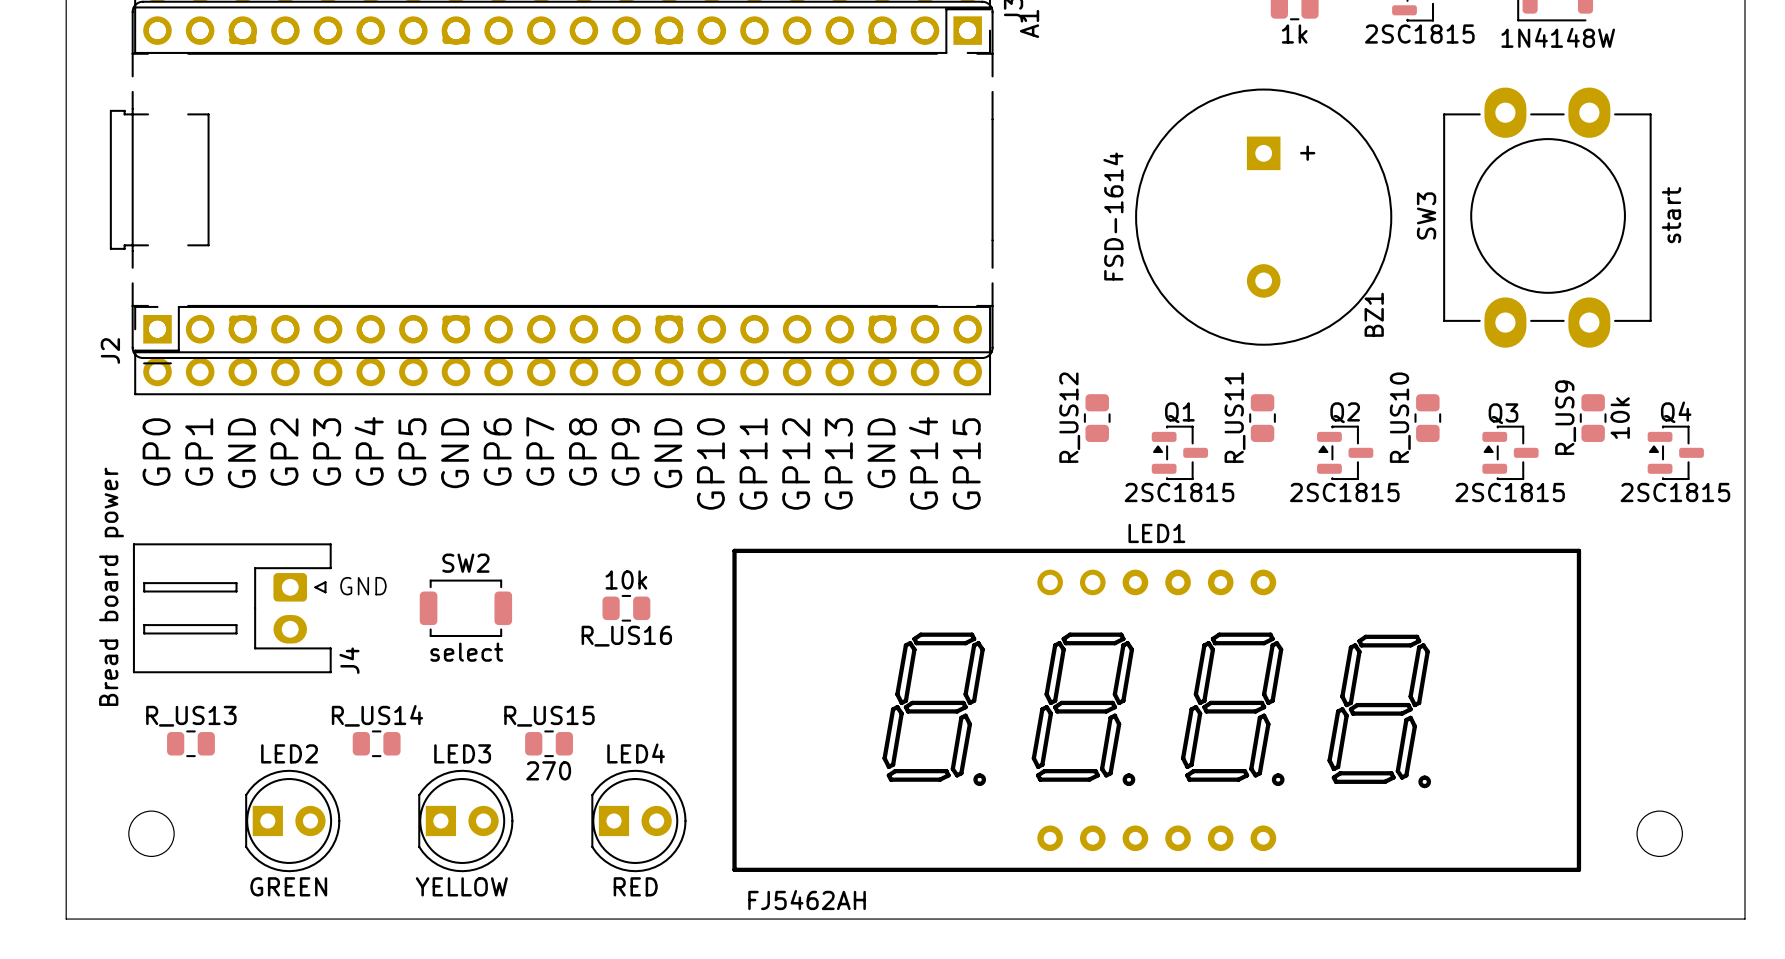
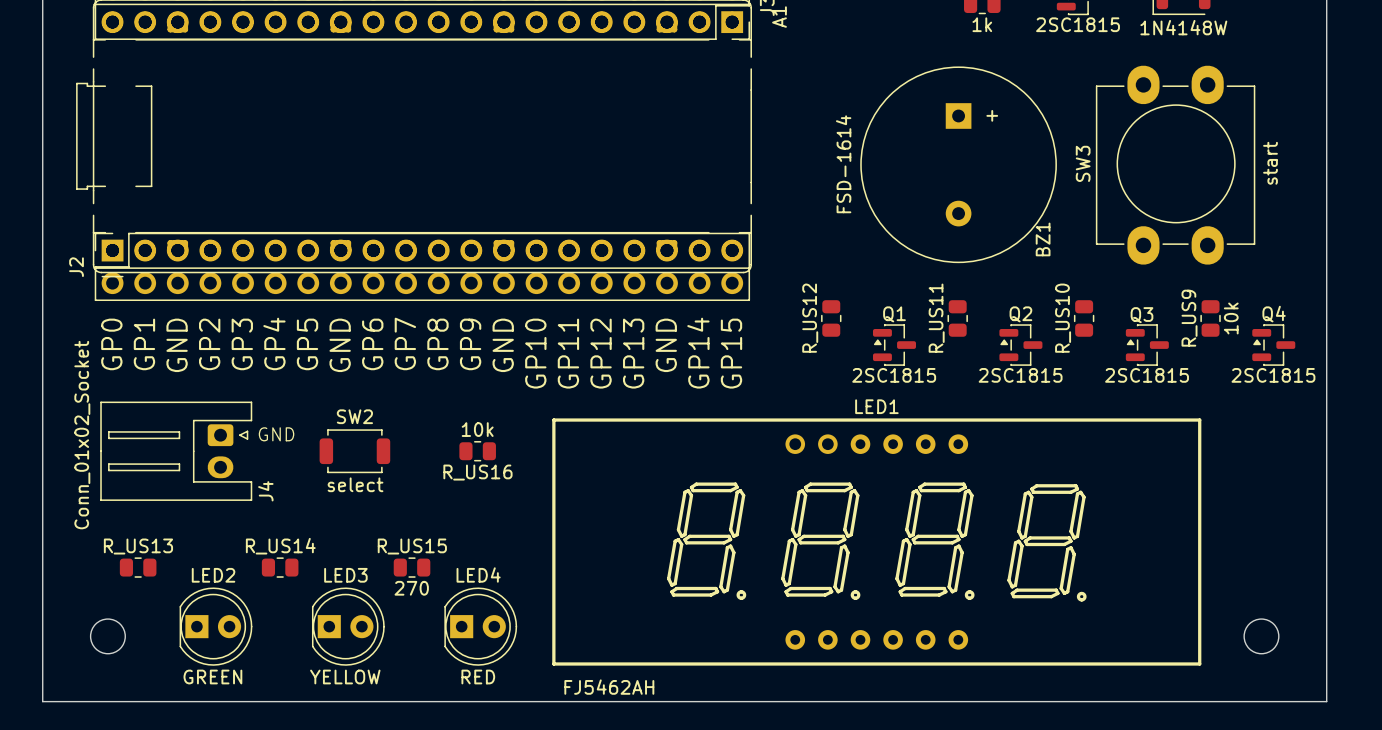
J4 value: Bread board power (111, 586) -> Conn_01x02_Socket (82, 435)
J4 position: (232, 608) -> (176, 451)
SW2 position: (465, 608) -> (354, 451)
R_US16 position: (626, 608) -> (477, 451)

